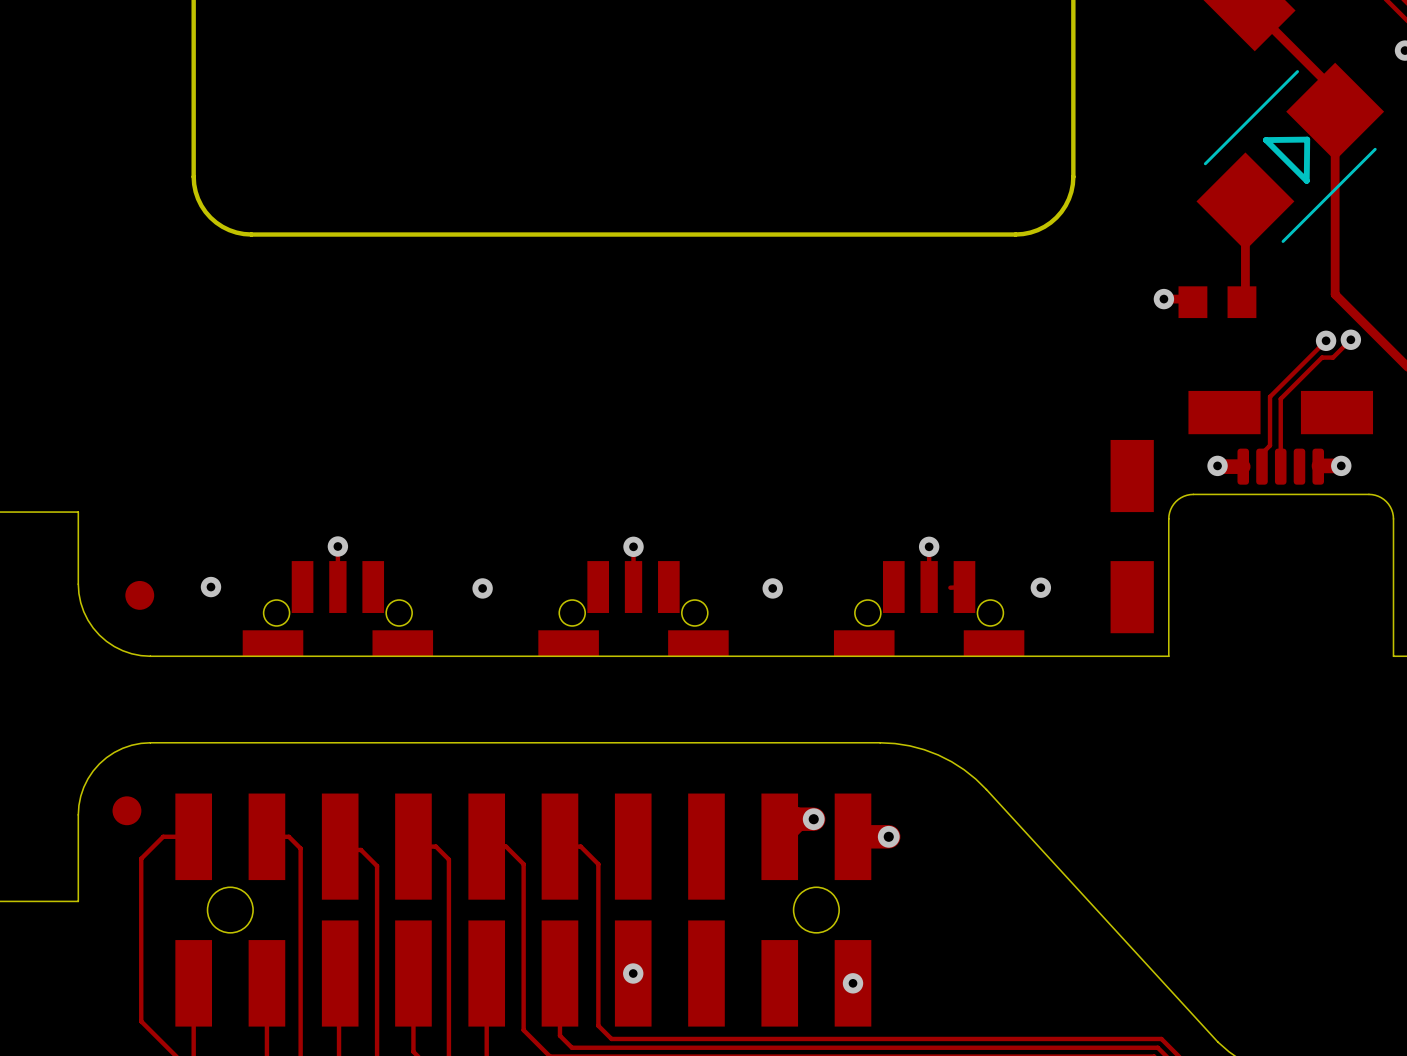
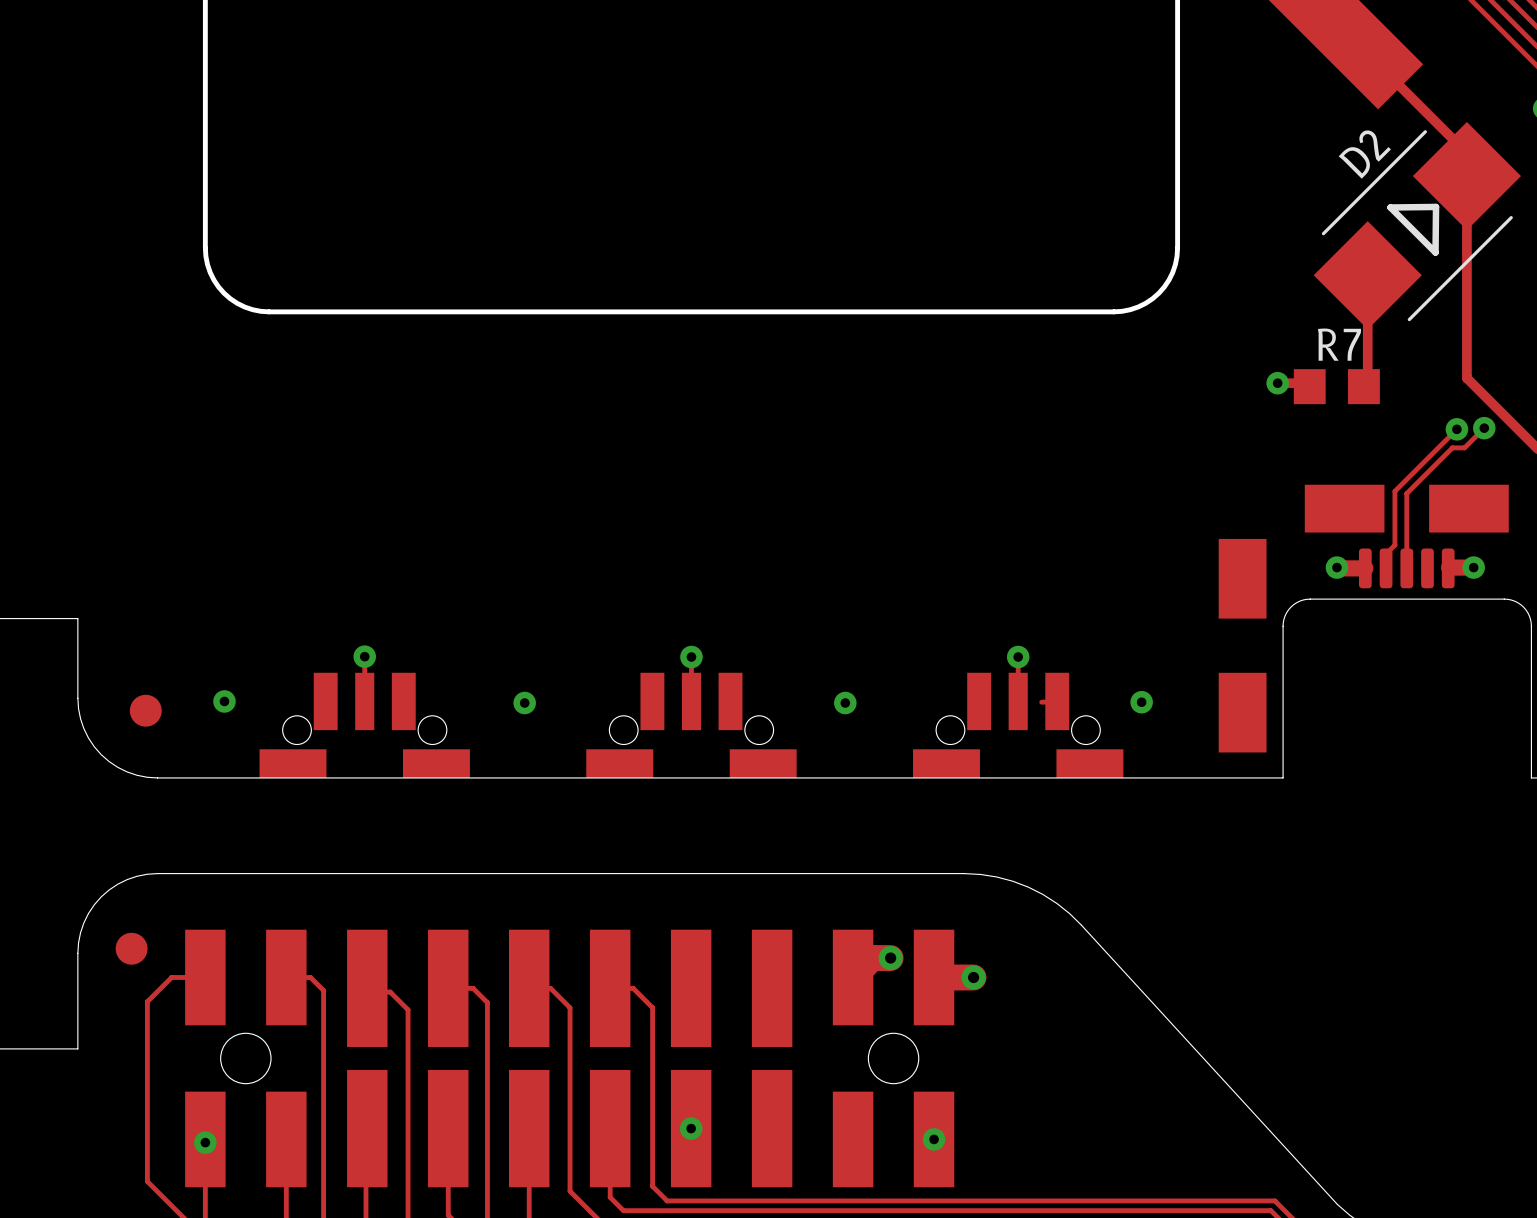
D2 name: none -> D2 (1364, 154)
R7 name: none -> R7 (1339, 344)
via: none -> (205, 1142)

